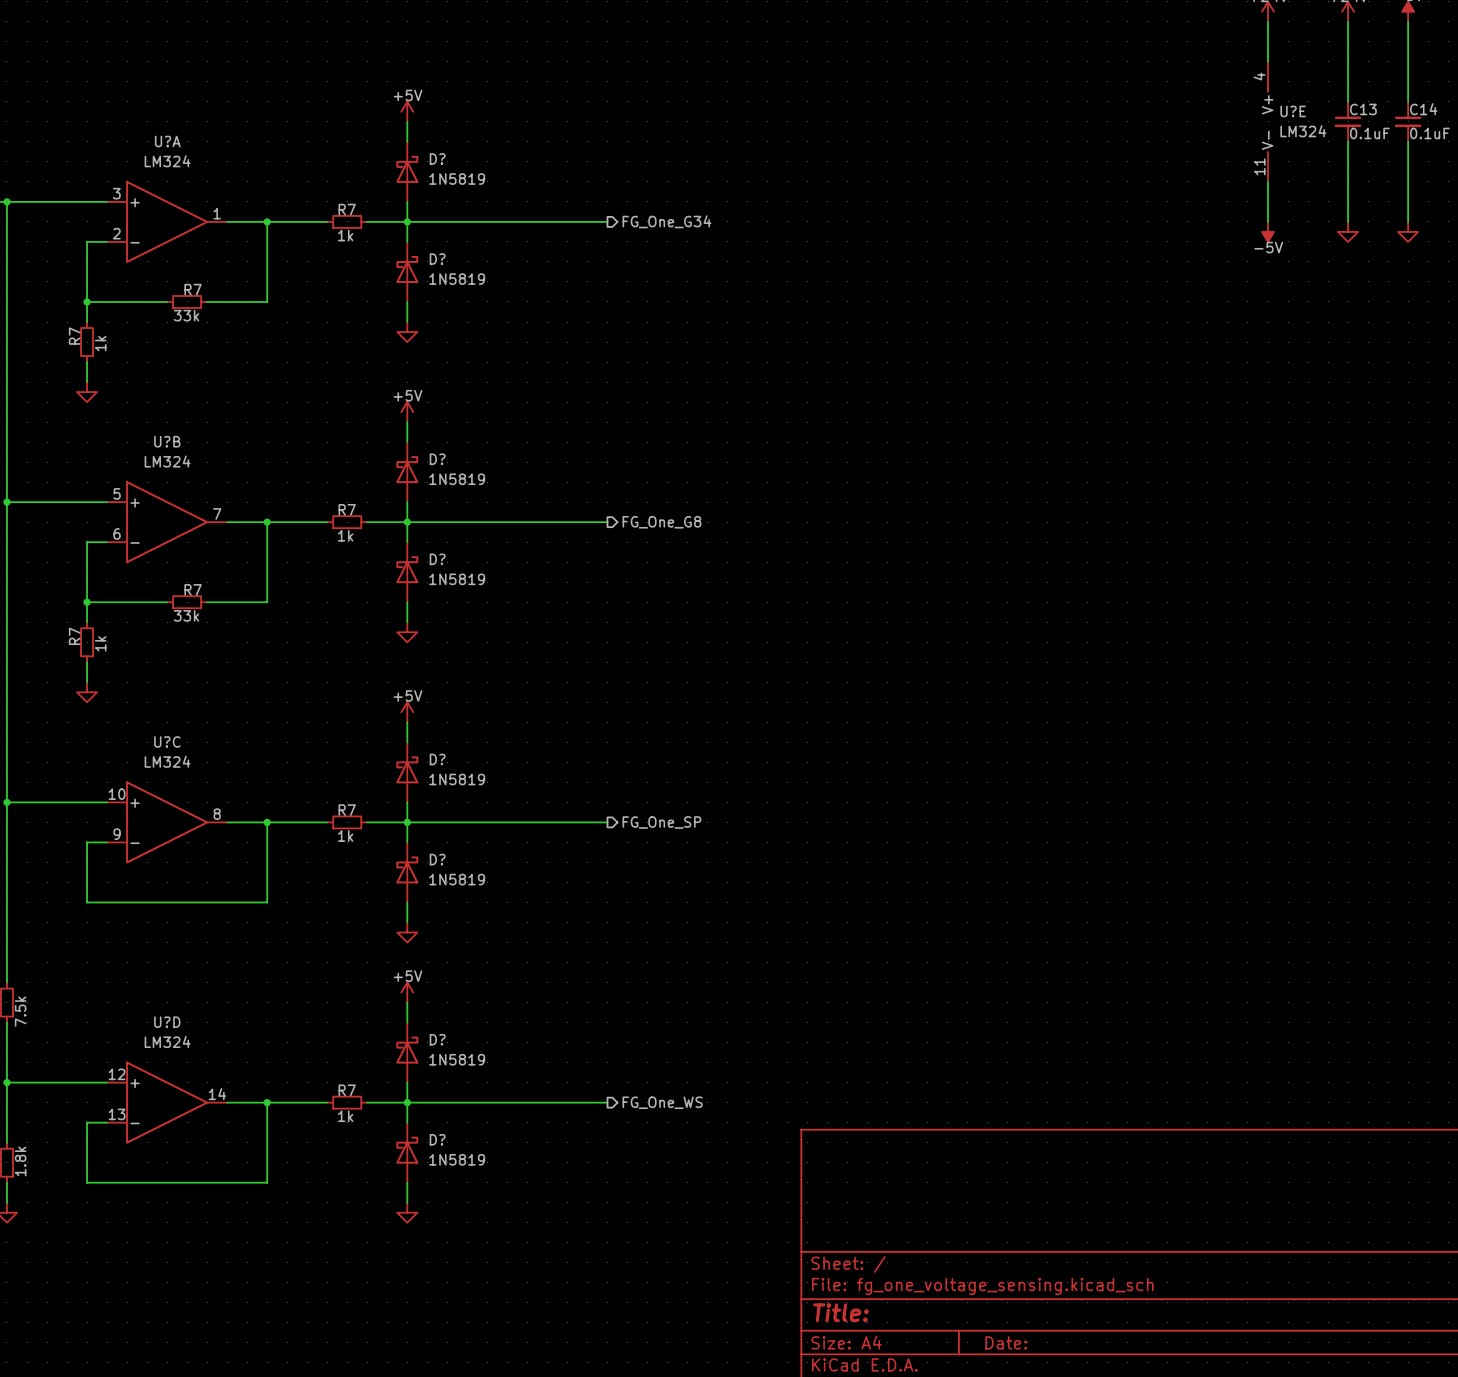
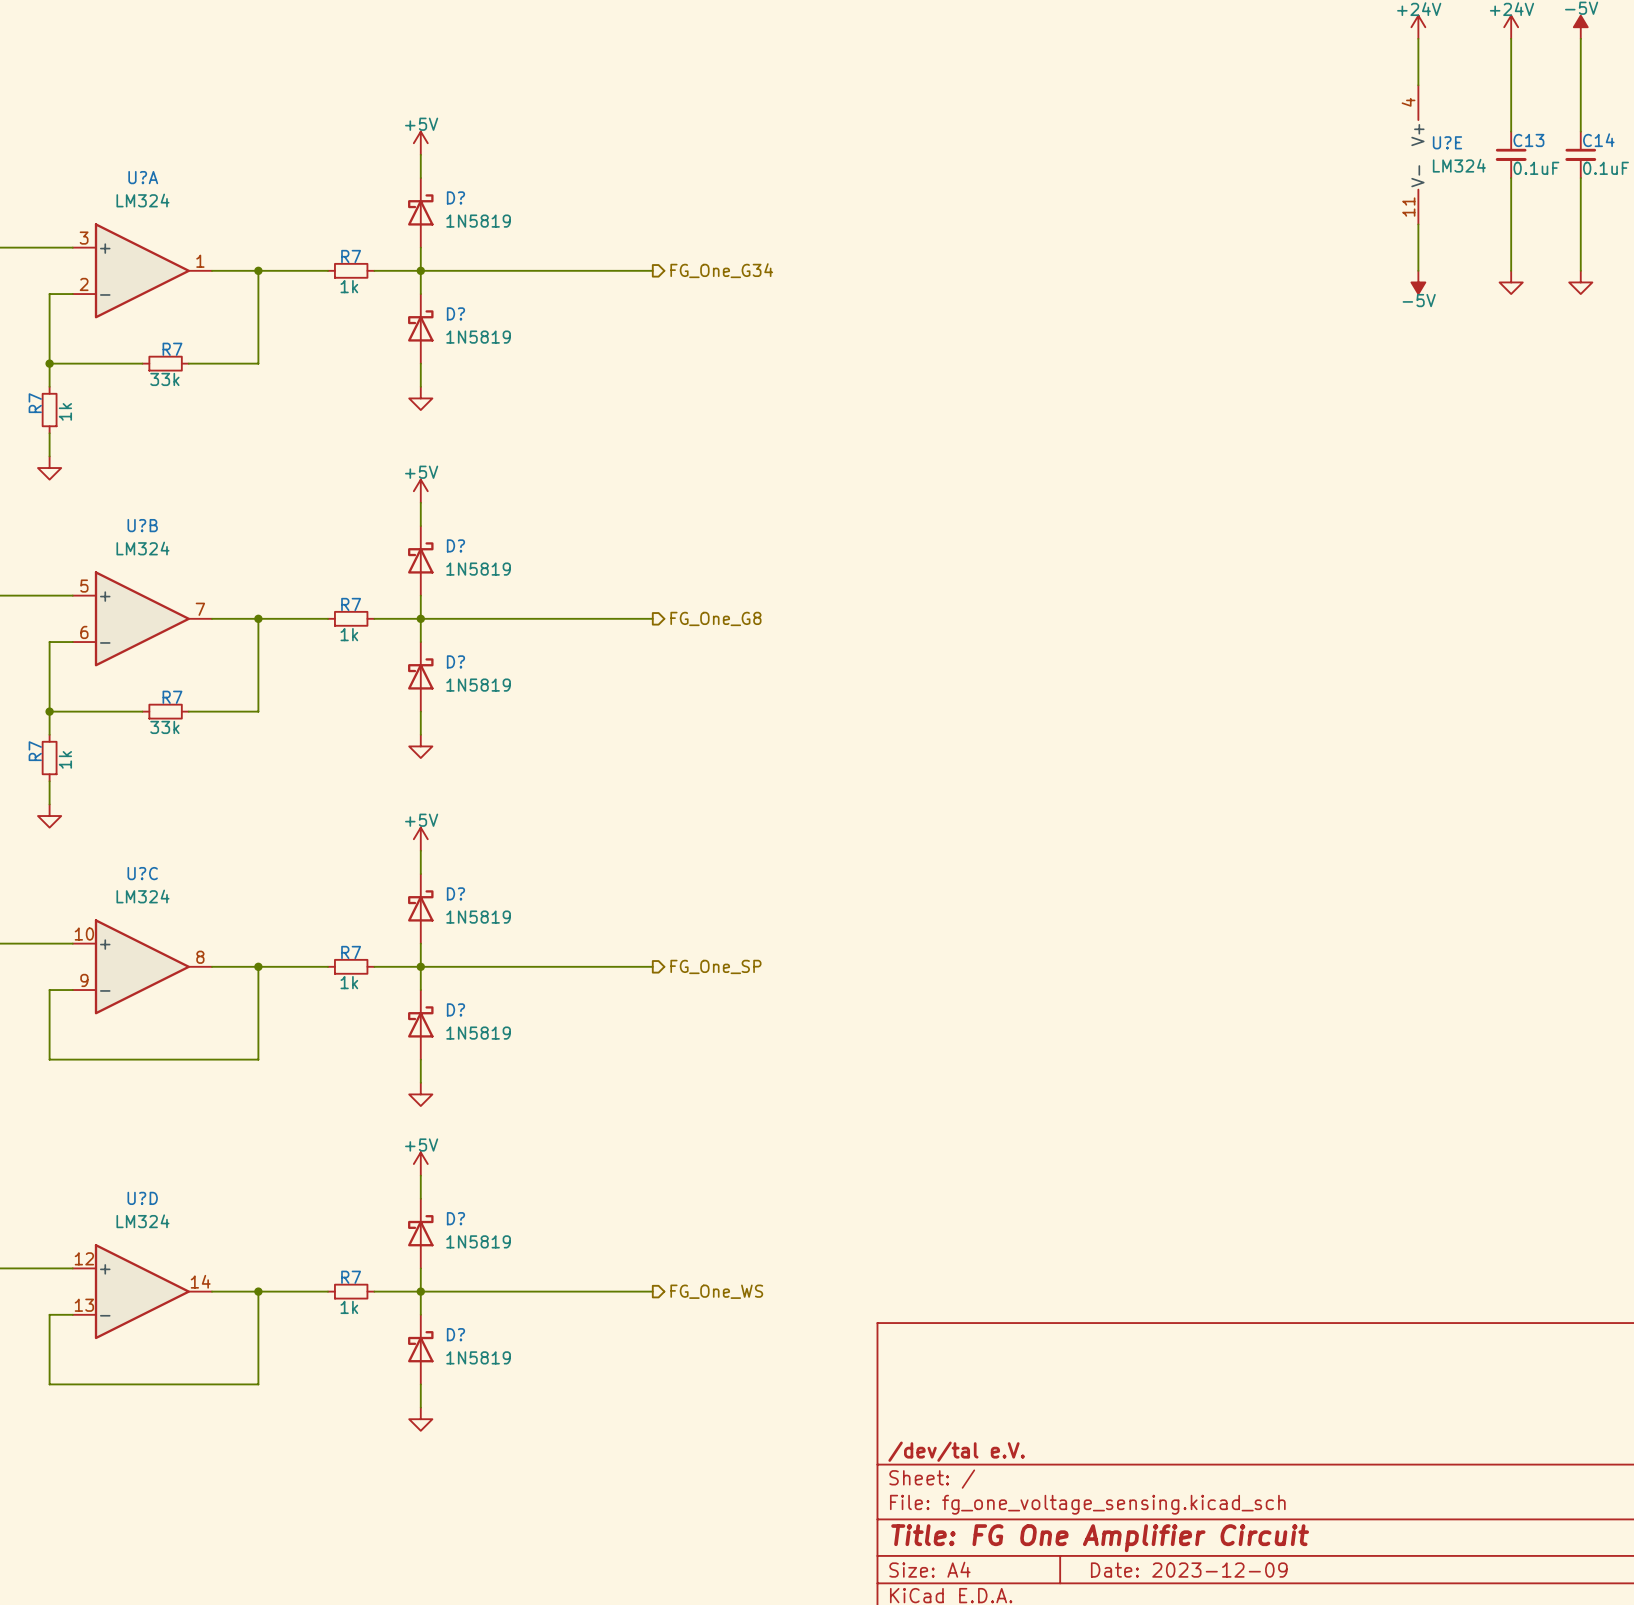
title block: none -> /dev/tal e.V. (956, 1451)
title block: Title: (840, 1312) -> Title: FG One Amplifier Circuit (1100, 1538)
title block: Date: (1006, 1342) -> Date: 2023-12-09 (1189, 1570)

